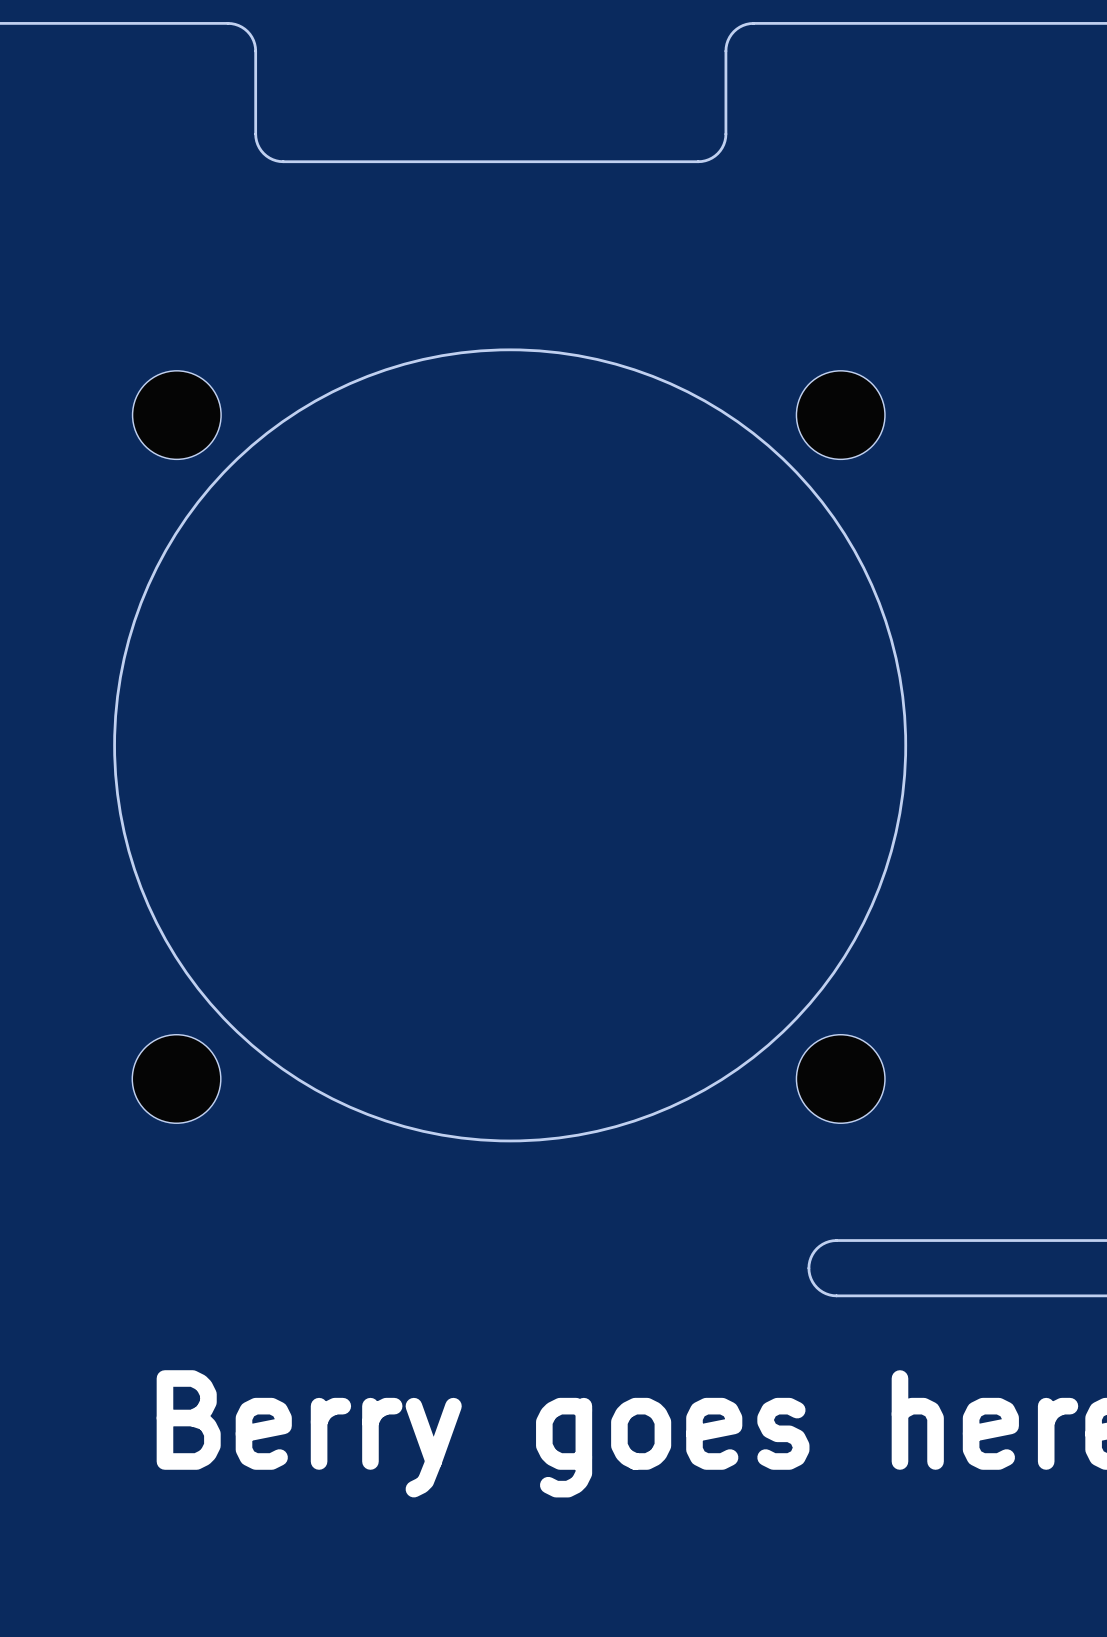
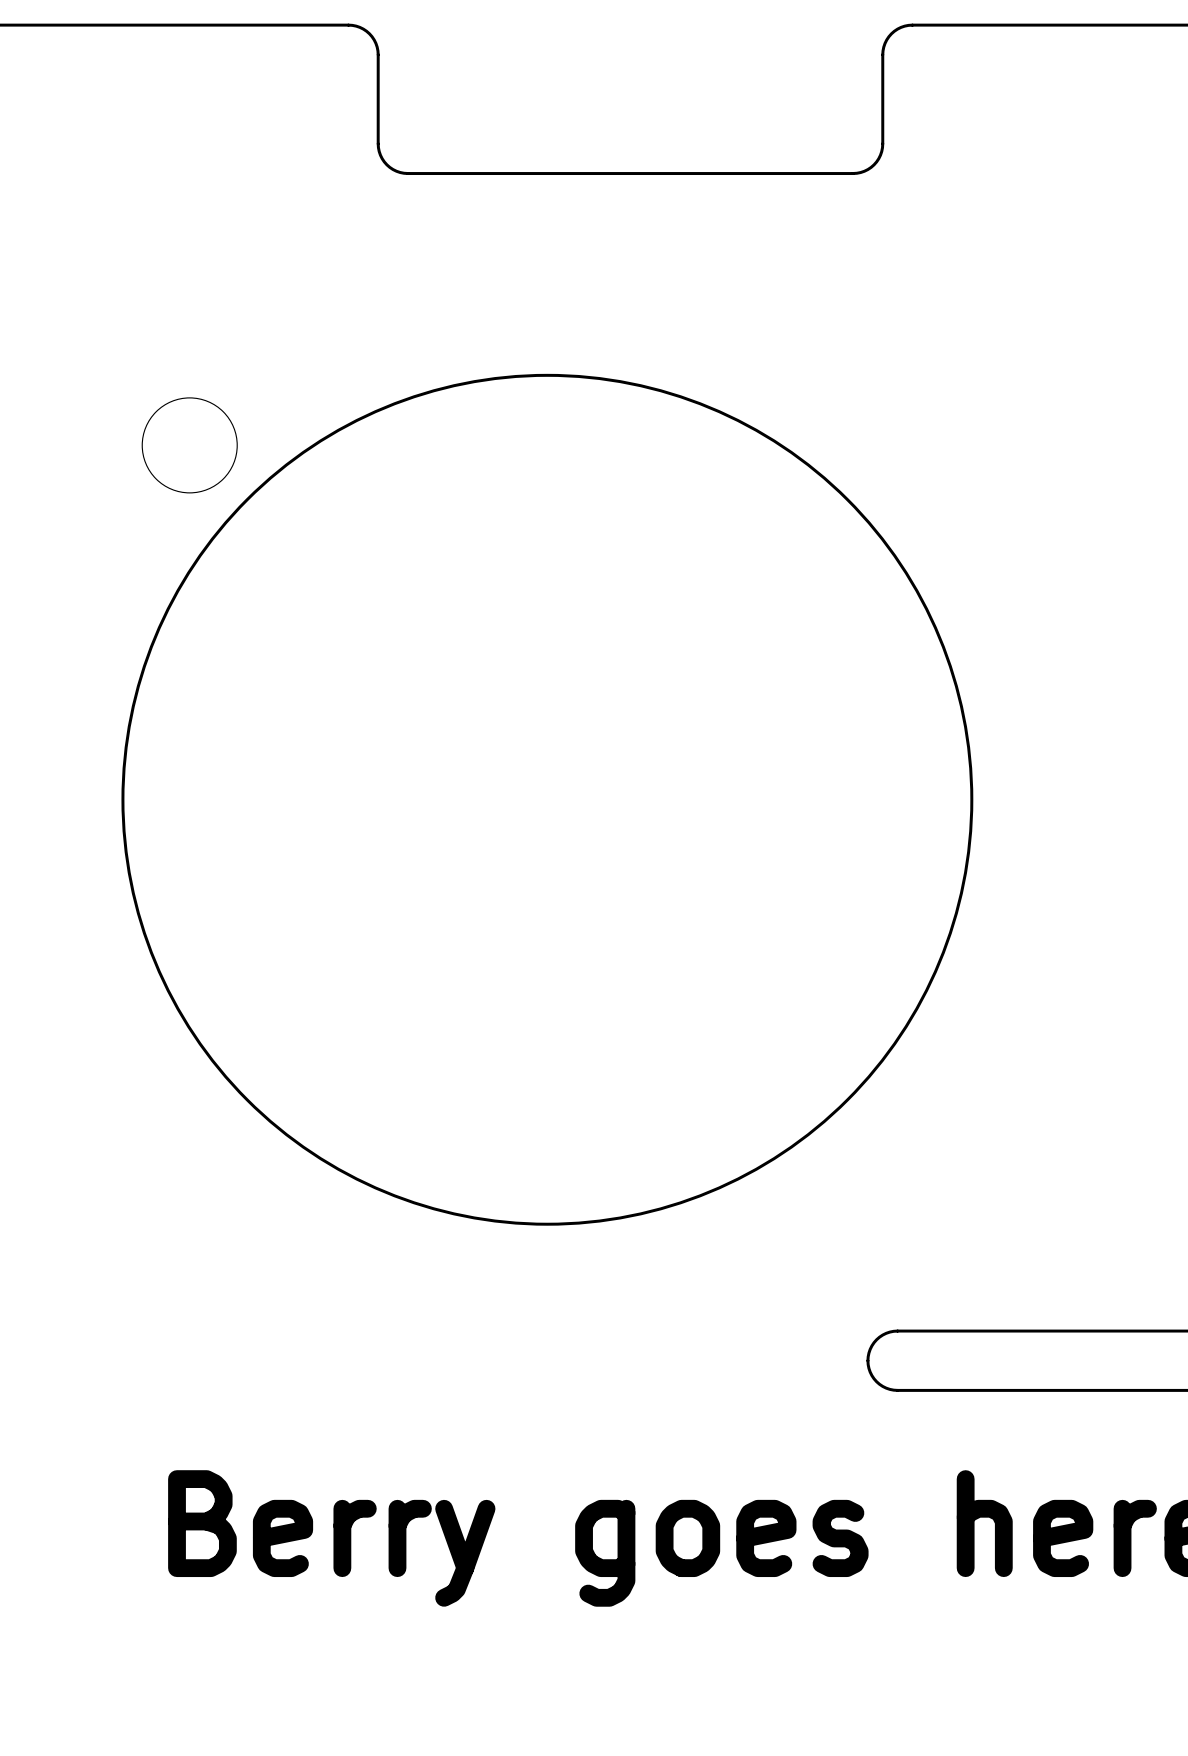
board edge: (228, 23) (244, 29) (254, 43) (255, 137) (263, 153) (279, 161) (380, 161) -> (244, 25) (352, 25) (363, 29) (369, 33) (374, 39) (377, 50) (379, 151) (384, 161) (389, 167) (396, 171) (407, 173)
board edge: (850, 23) (749, 23) (734, 31) (726, 47) (724, 141) (715, 156) (698, 161) -> (912, 25) (901, 27) (894, 31) (888, 36) (883, 47) (882, 147) (878, 158) (874, 164) (864, 171) (856, 173) (749, 173)
part: (840, 415) -> none
part: (176, 1078) -> none
part: (840, 1078) -> none

